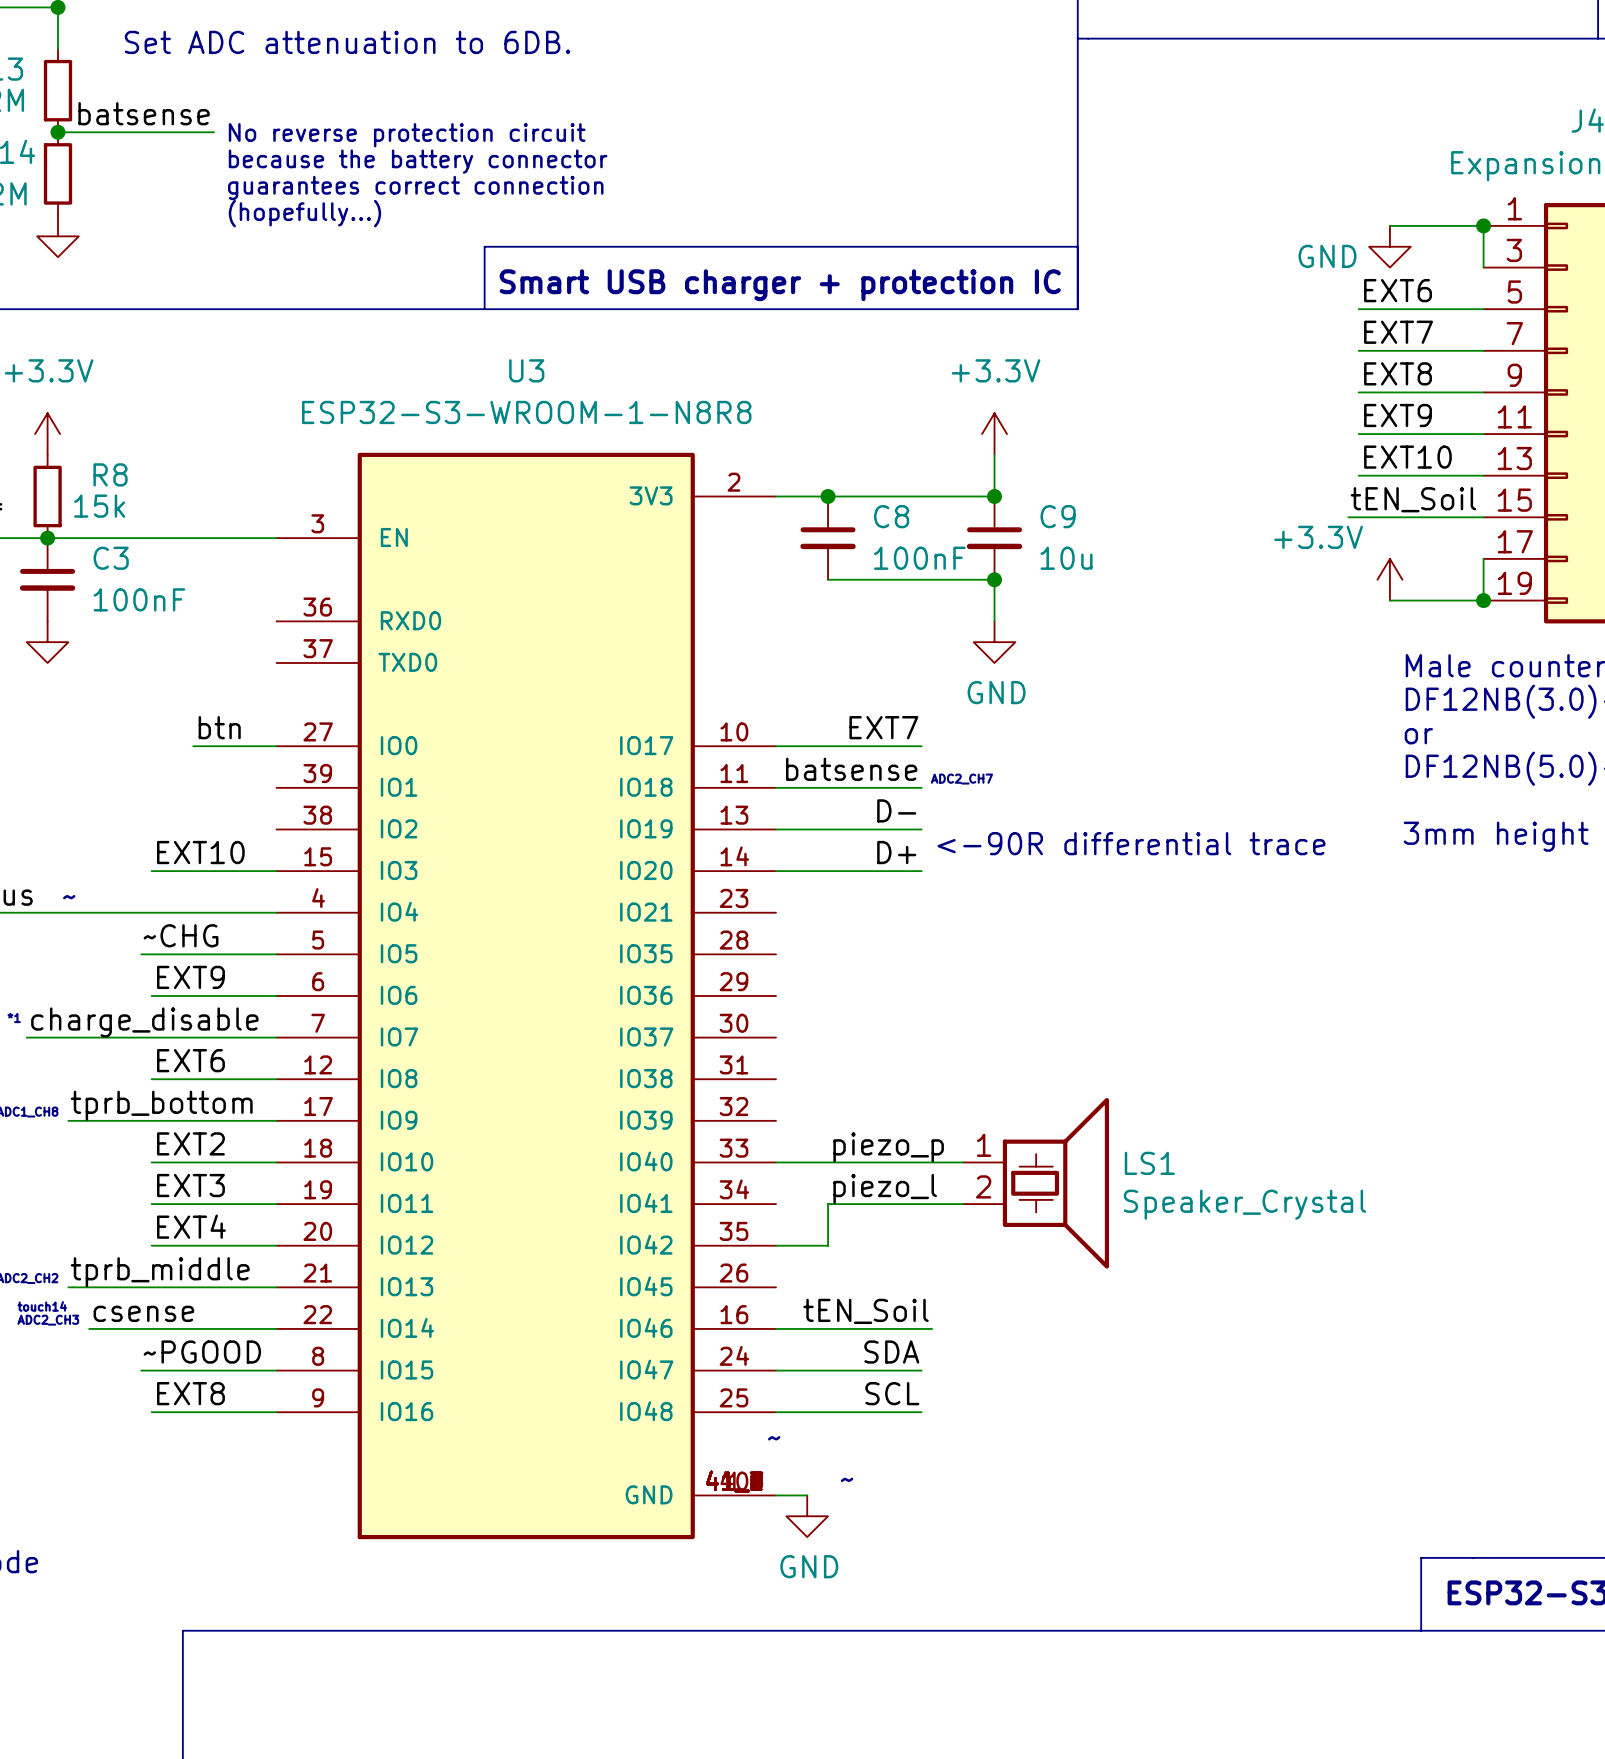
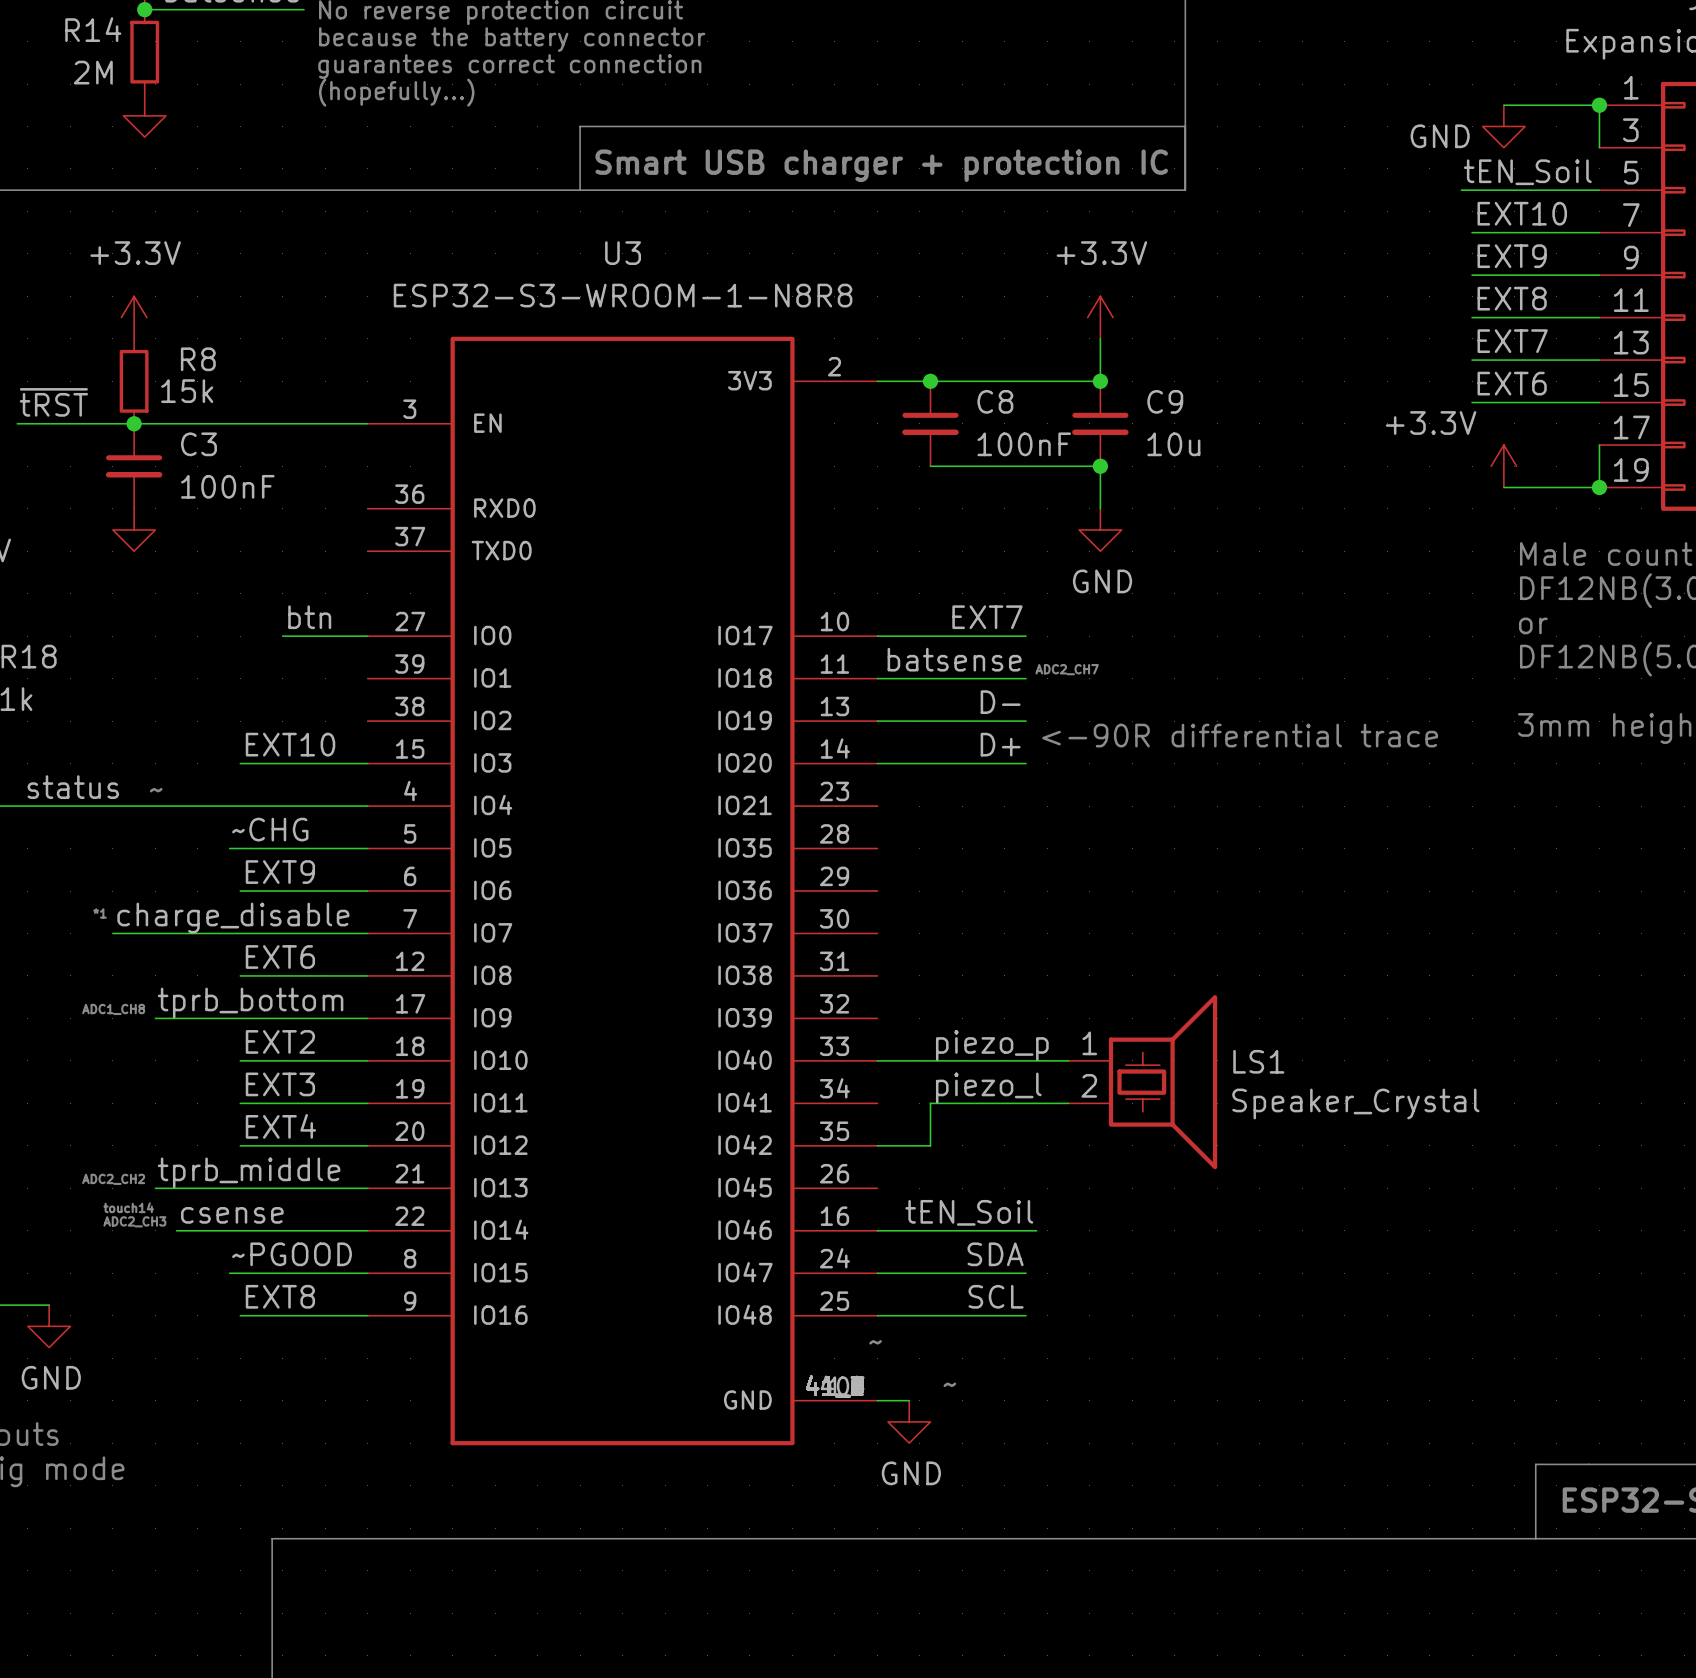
label: EXT6 (1398, 290) -> tEN_Soil (1527, 172)
label: EXT7 (1398, 332) -> EXT10 (1522, 213)
label: EXT8 (1398, 373) -> EXT9 (1512, 256)
label: EXT9 (1398, 415) -> EXT8 (1512, 298)
label: EXT10 (1407, 457) -> EXT7 (1512, 341)
label: tEN_Soil (1413, 499) -> EXT6 (1512, 383)
wire: (1348, 517) (1358, 517) -> (1461, 190) (1472, 190)

